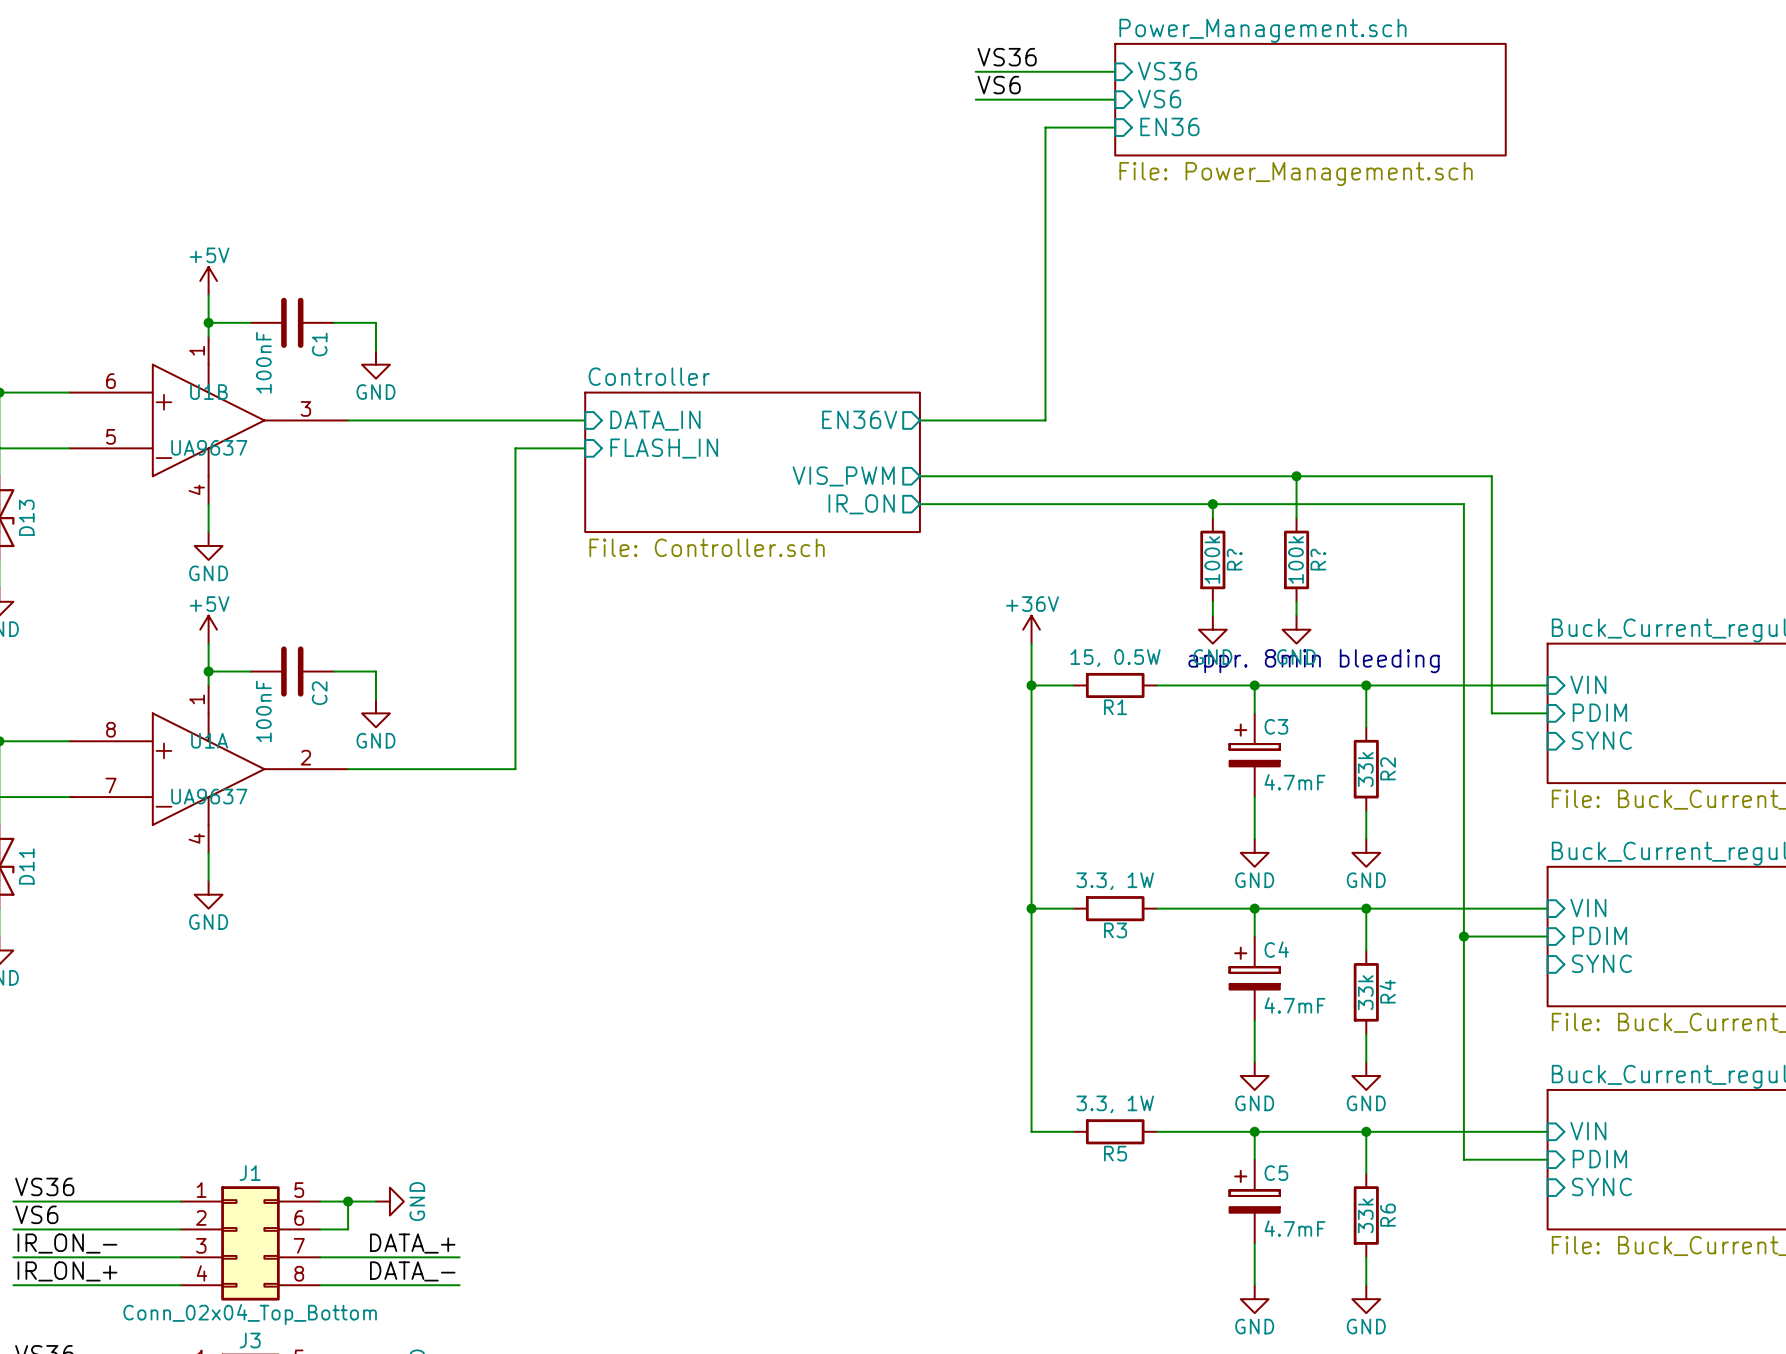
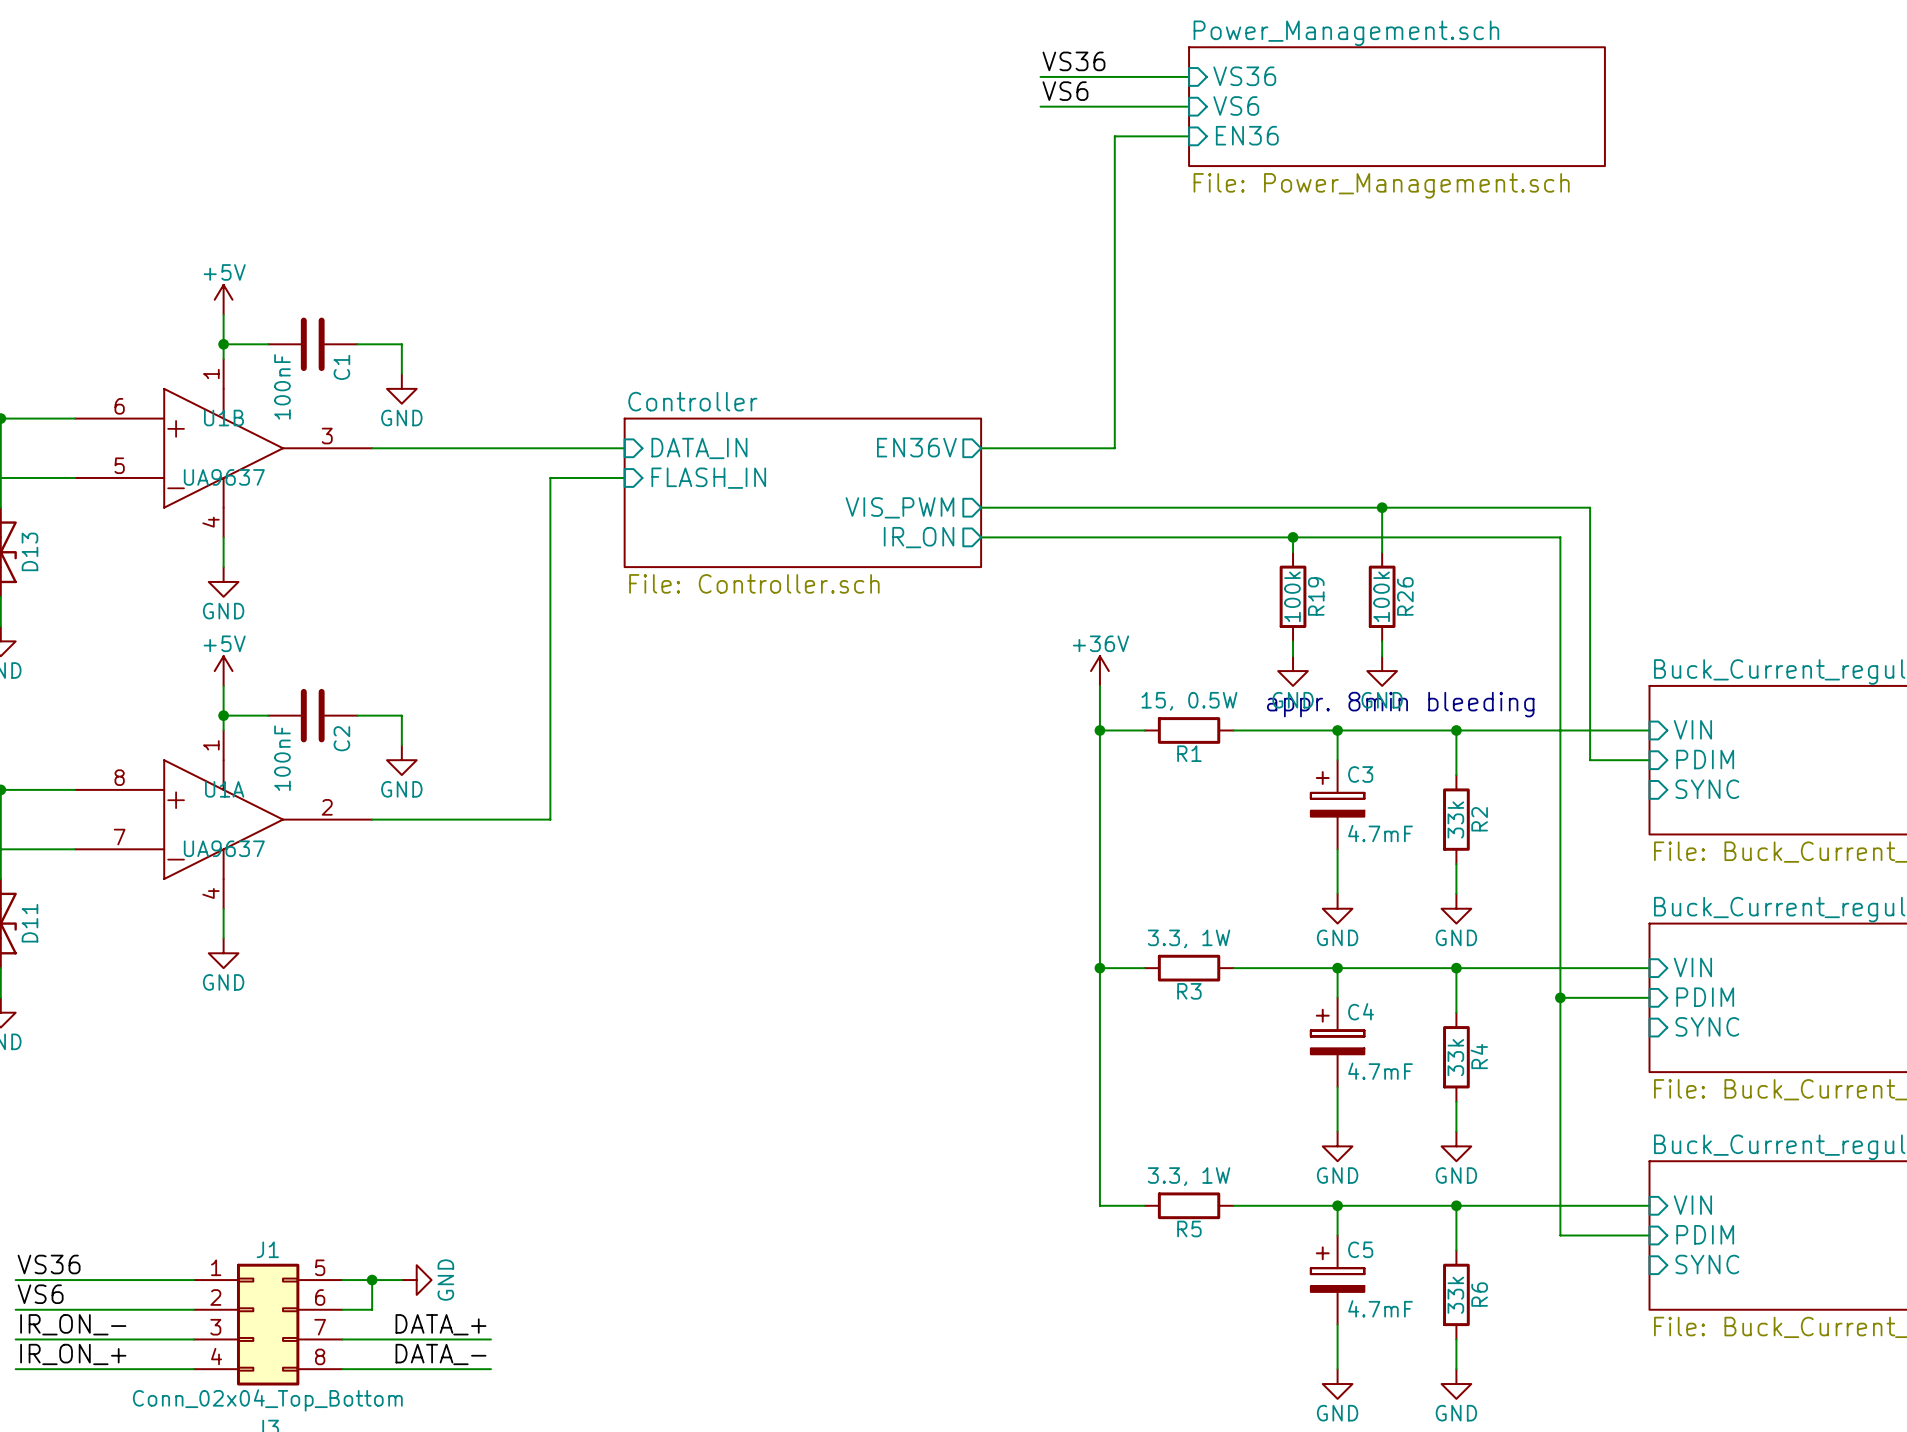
R? name: R? (1234, 559) -> R19 (1316, 596)
R? name: R? (1318, 559) -> R26 (1405, 596)

